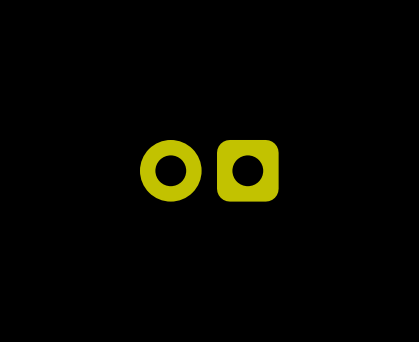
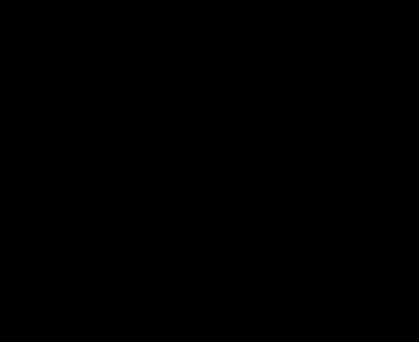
part: (209, 170) -> none

